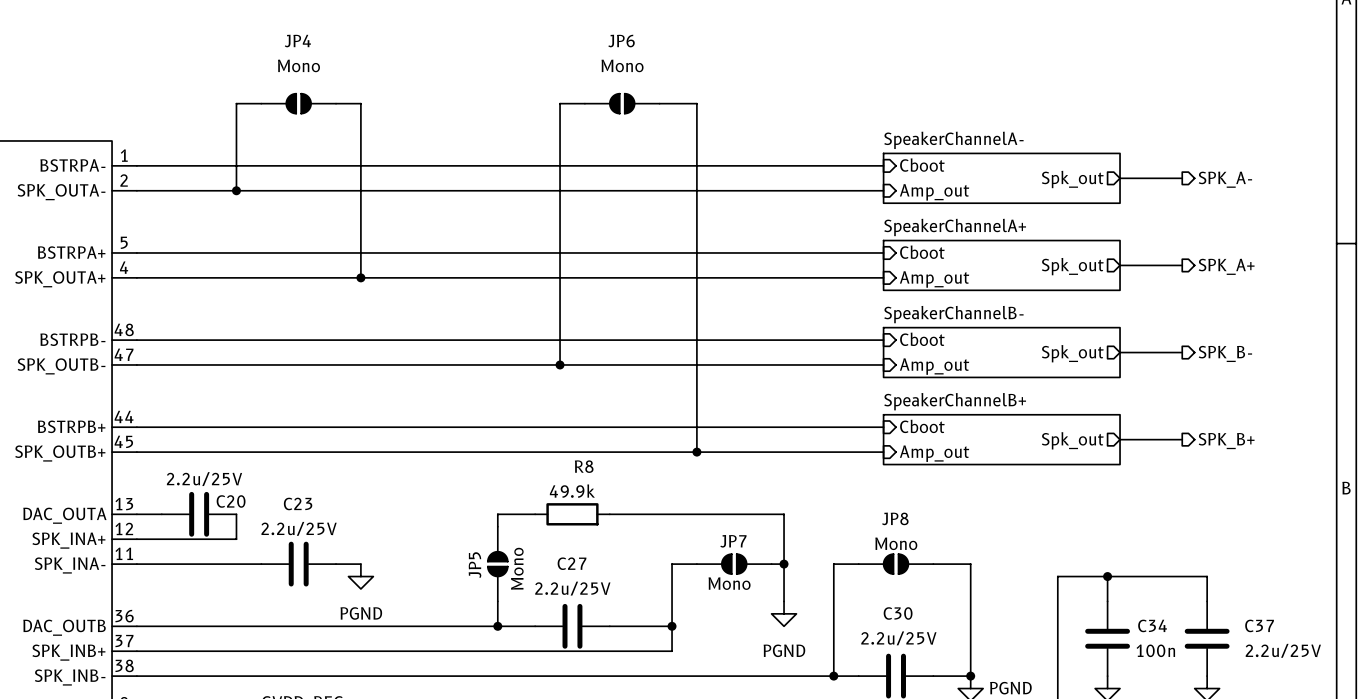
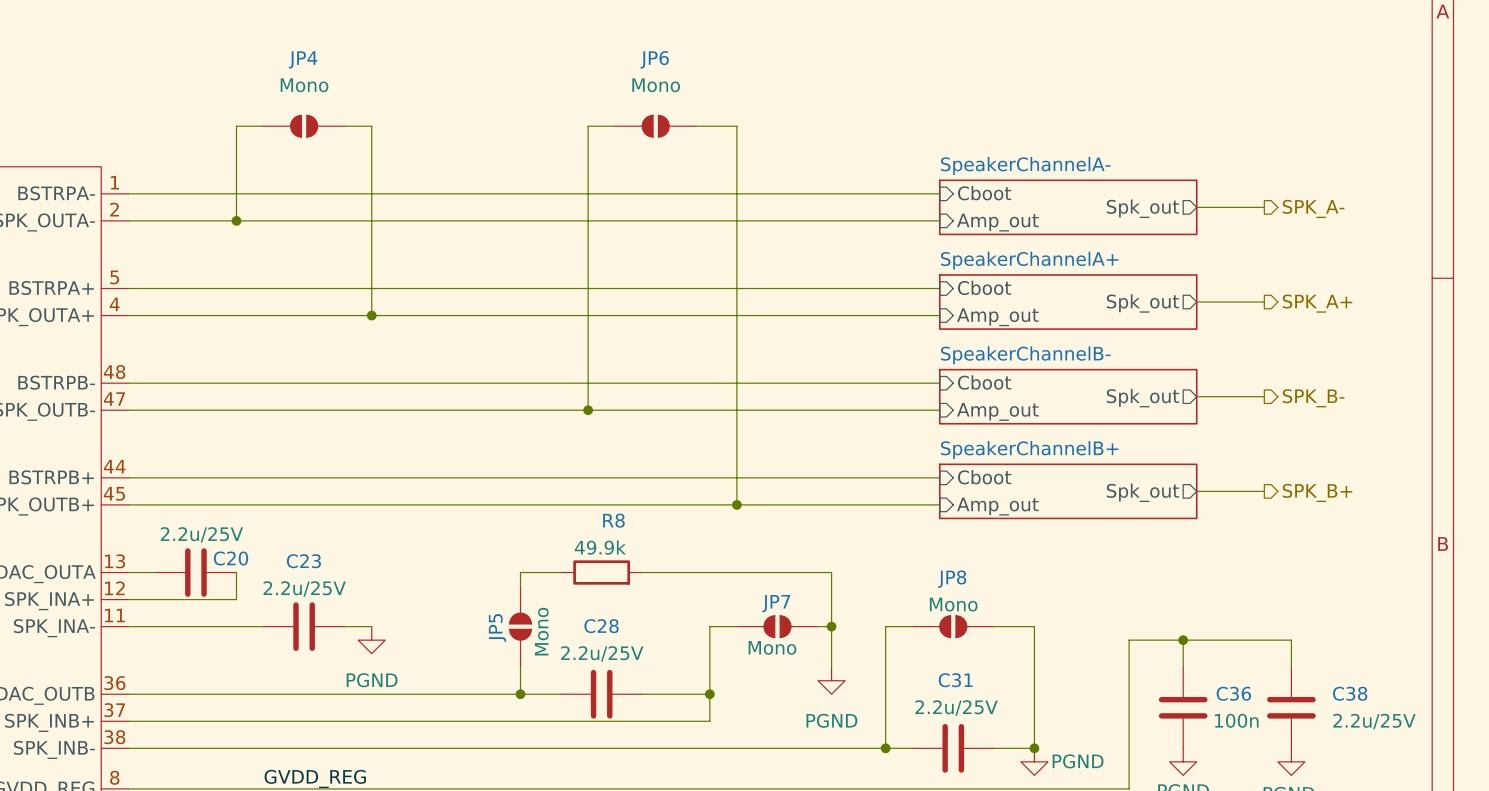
C27 name: C27 (572, 563) -> C28 (601, 626)
C30 name: C30 (898, 613) -> C31 (955, 680)
C34 name: C34 (1152, 625) -> C36 (1233, 693)
C37 name: C37 (1259, 625) -> C38 (1350, 693)

